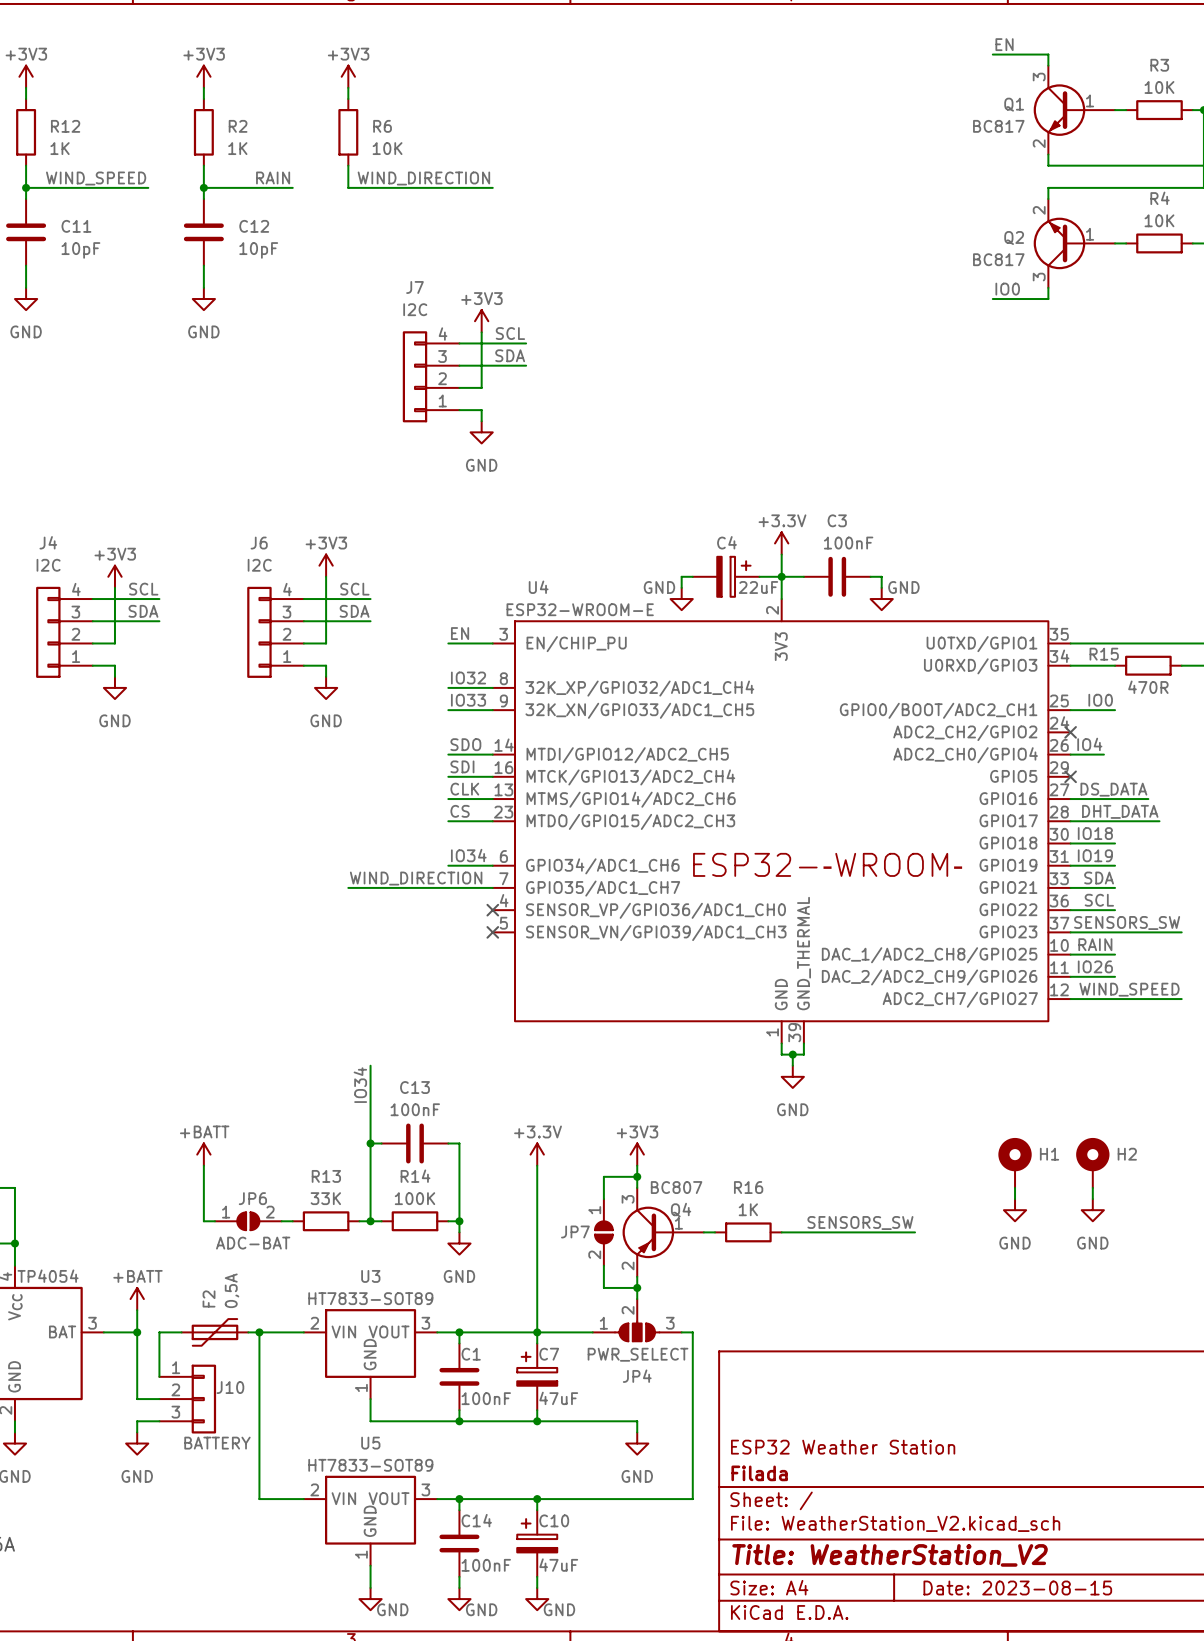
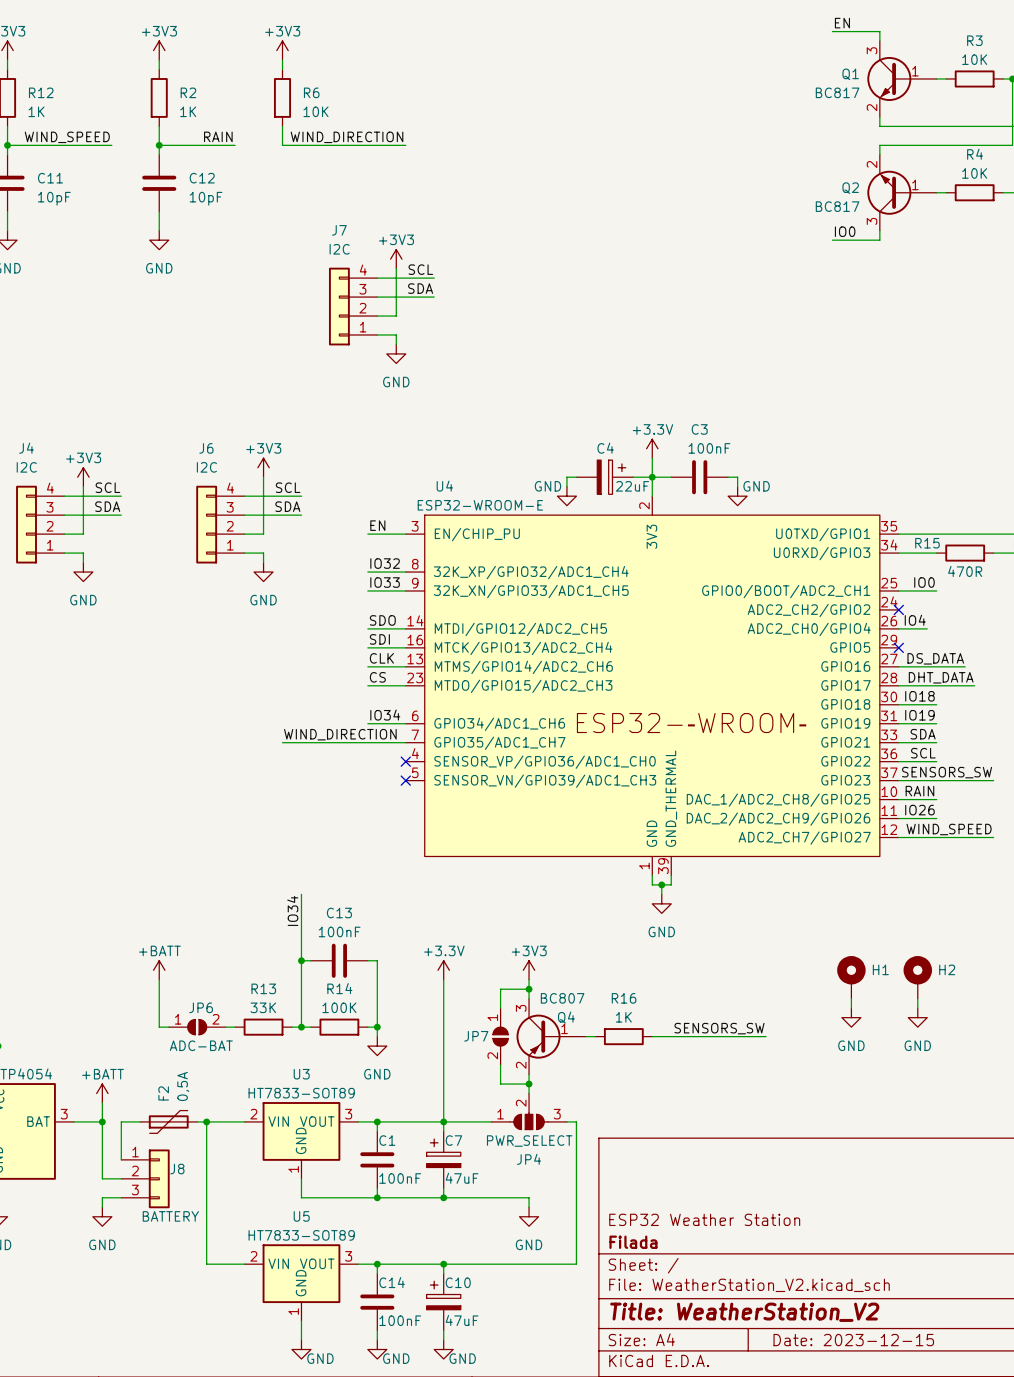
J10 name: J10 (230, 1387) -> J8 (177, 1169)
title block: Date: 2023-08-15 (1017, 1588) -> Date: 2023-12-15 (853, 1340)

